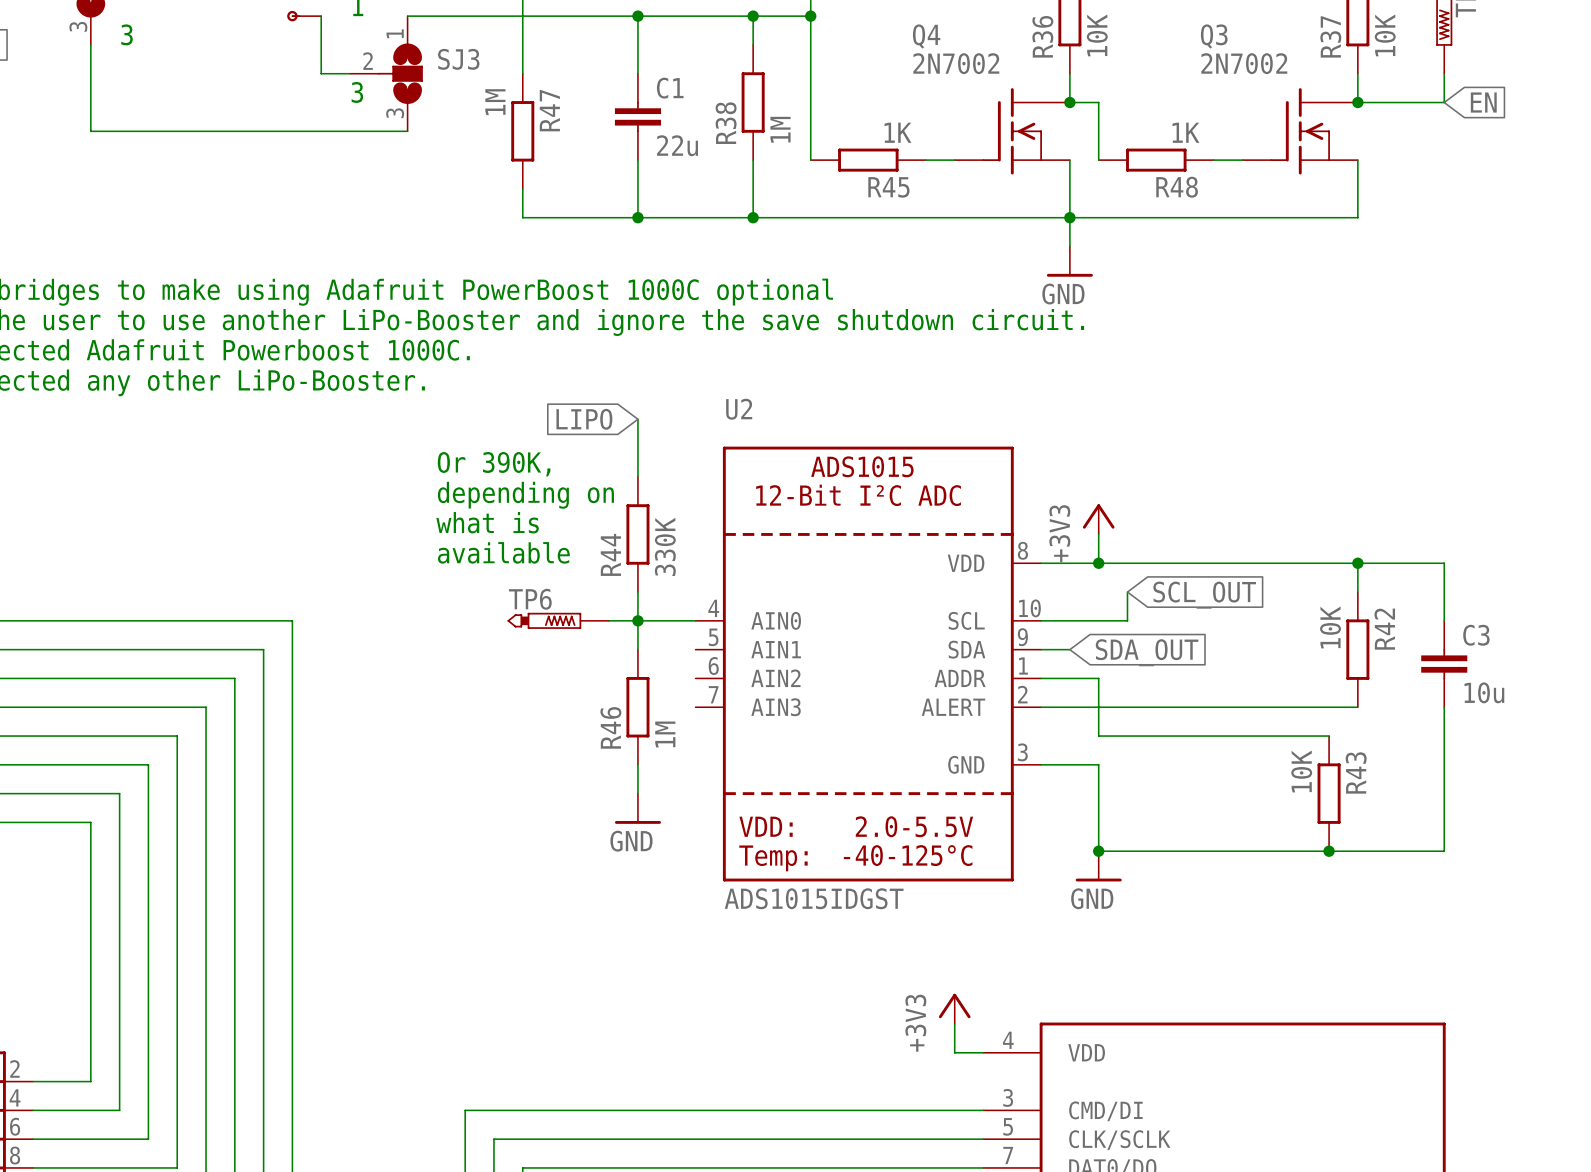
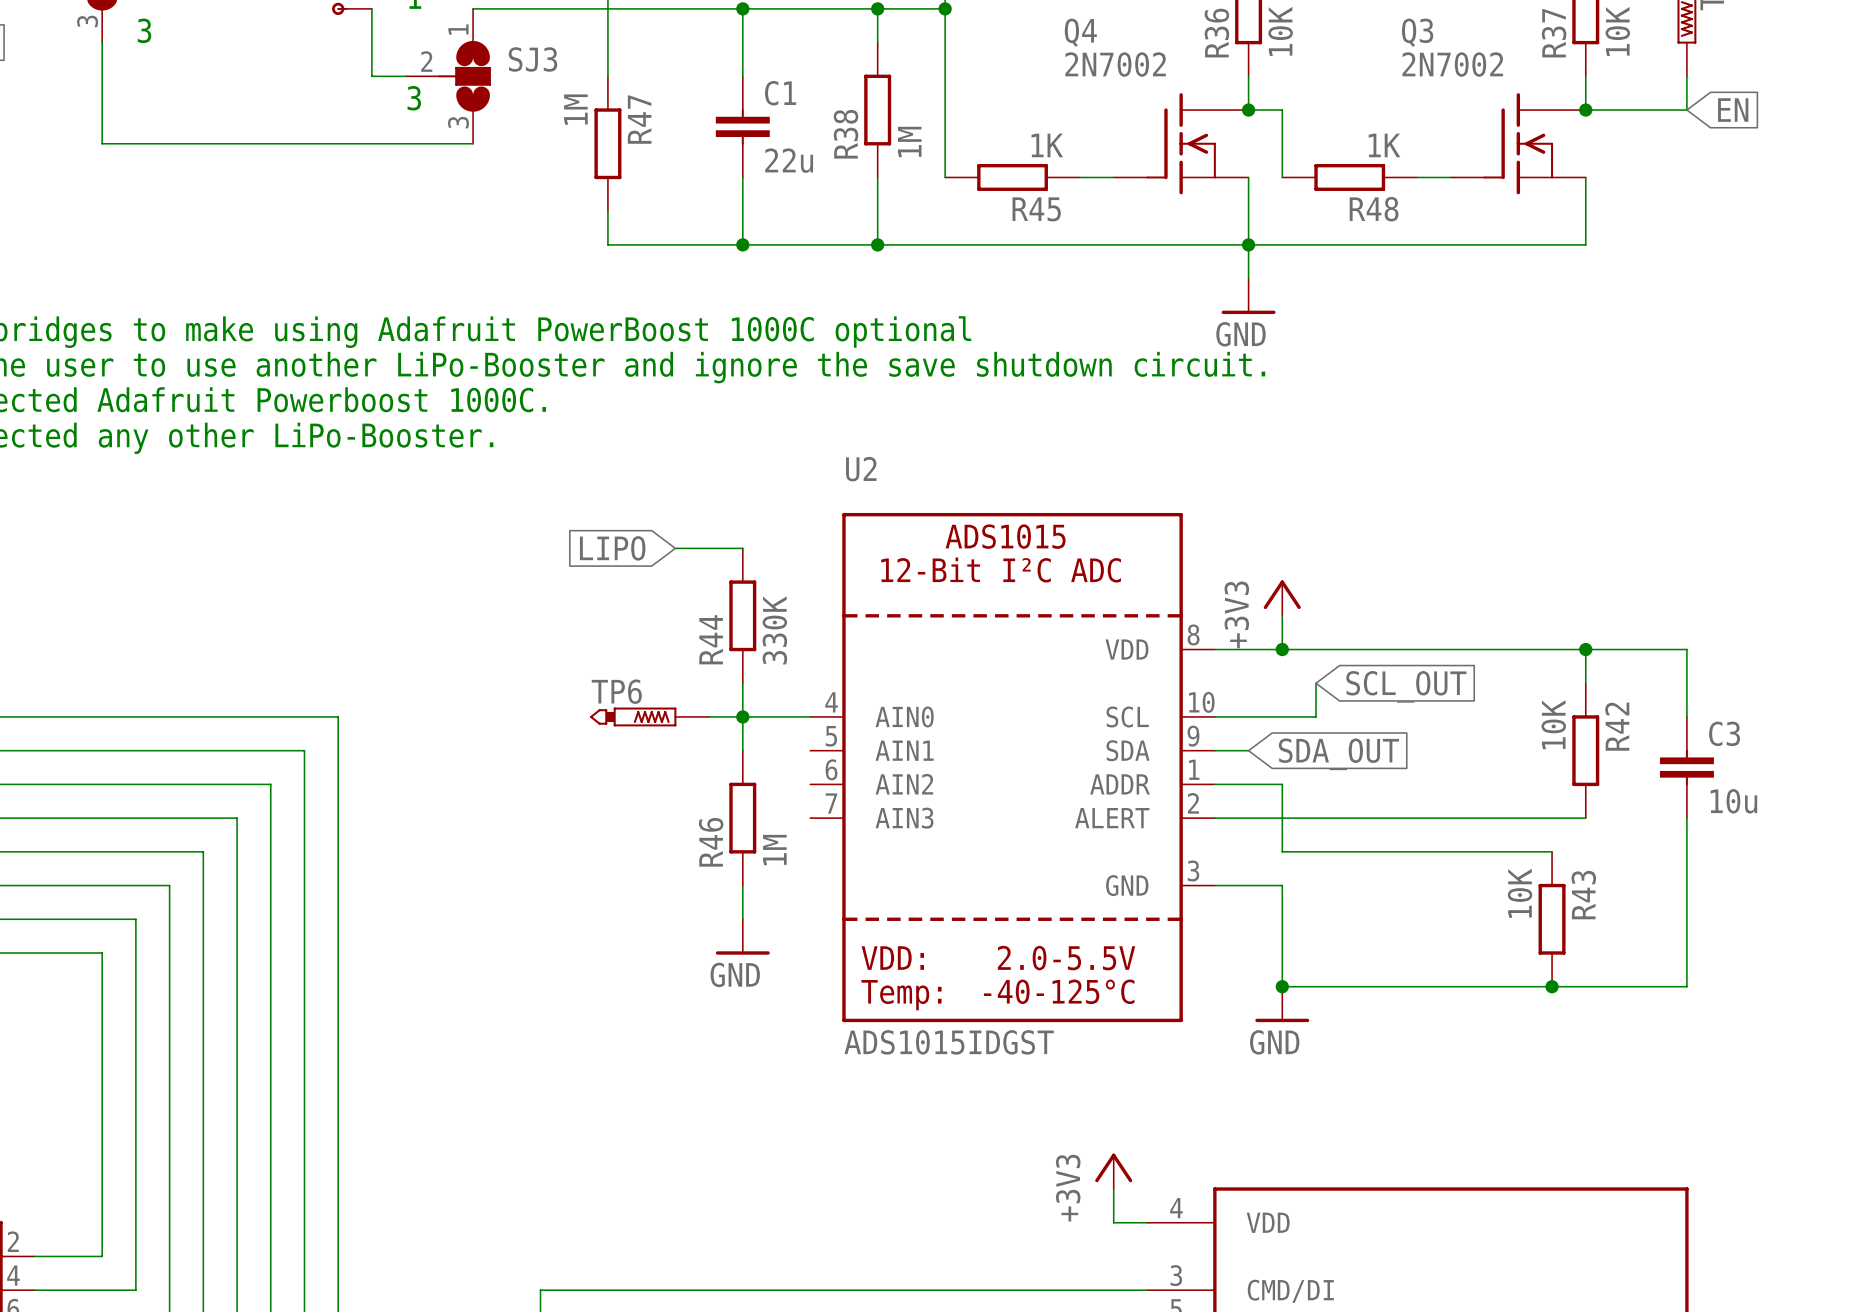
global label position: LIPO (584, 419) -> LIPO (612, 548)
wire: (637, 419) (637, 476) -> (675, 548) (742, 548)
text: Or 390K, (494, 464) -> none
text: depending on (525, 495) -> none
text: what is (487, 522) -> none
text: available (503, 552) -> none

